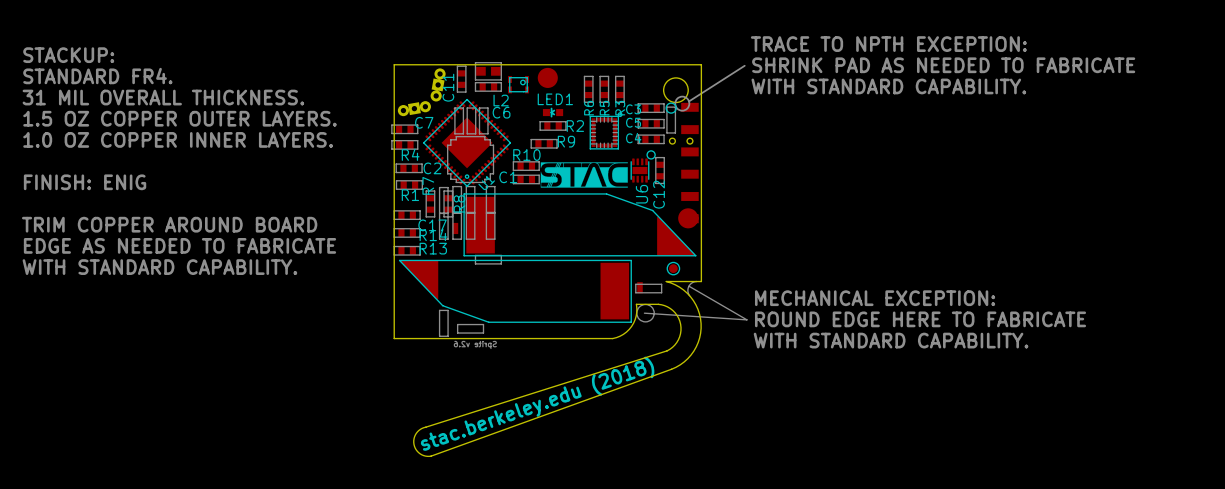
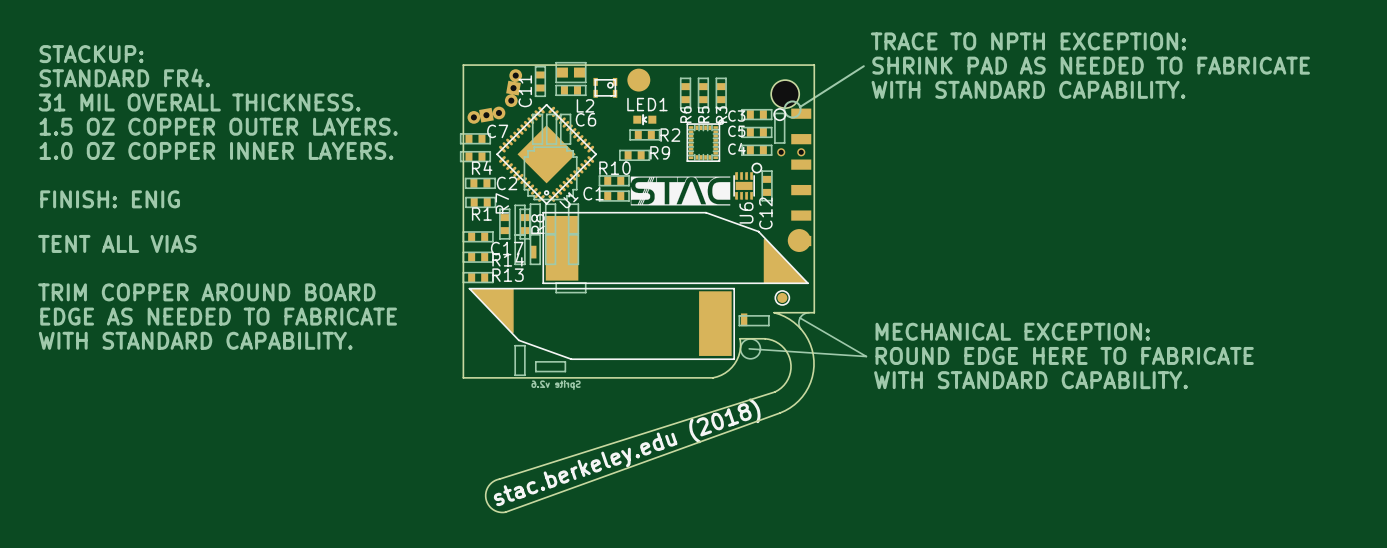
text: none -> TENT ALL VIAS (117, 243)
text position: TRIM COPPER AROUND BOARD (169, 224) -> TRIM COPPER AROUND BOARD (206, 292)
text position: EDGE AS NEEDED TO FABRICATE (180, 245) -> EDGE AS NEEDED TO FABRICATE (218, 316)
text position: WITH STANDARD CAPABILITY. (159, 267) -> WITH STANDARD CAPABILITY. (195, 340)

